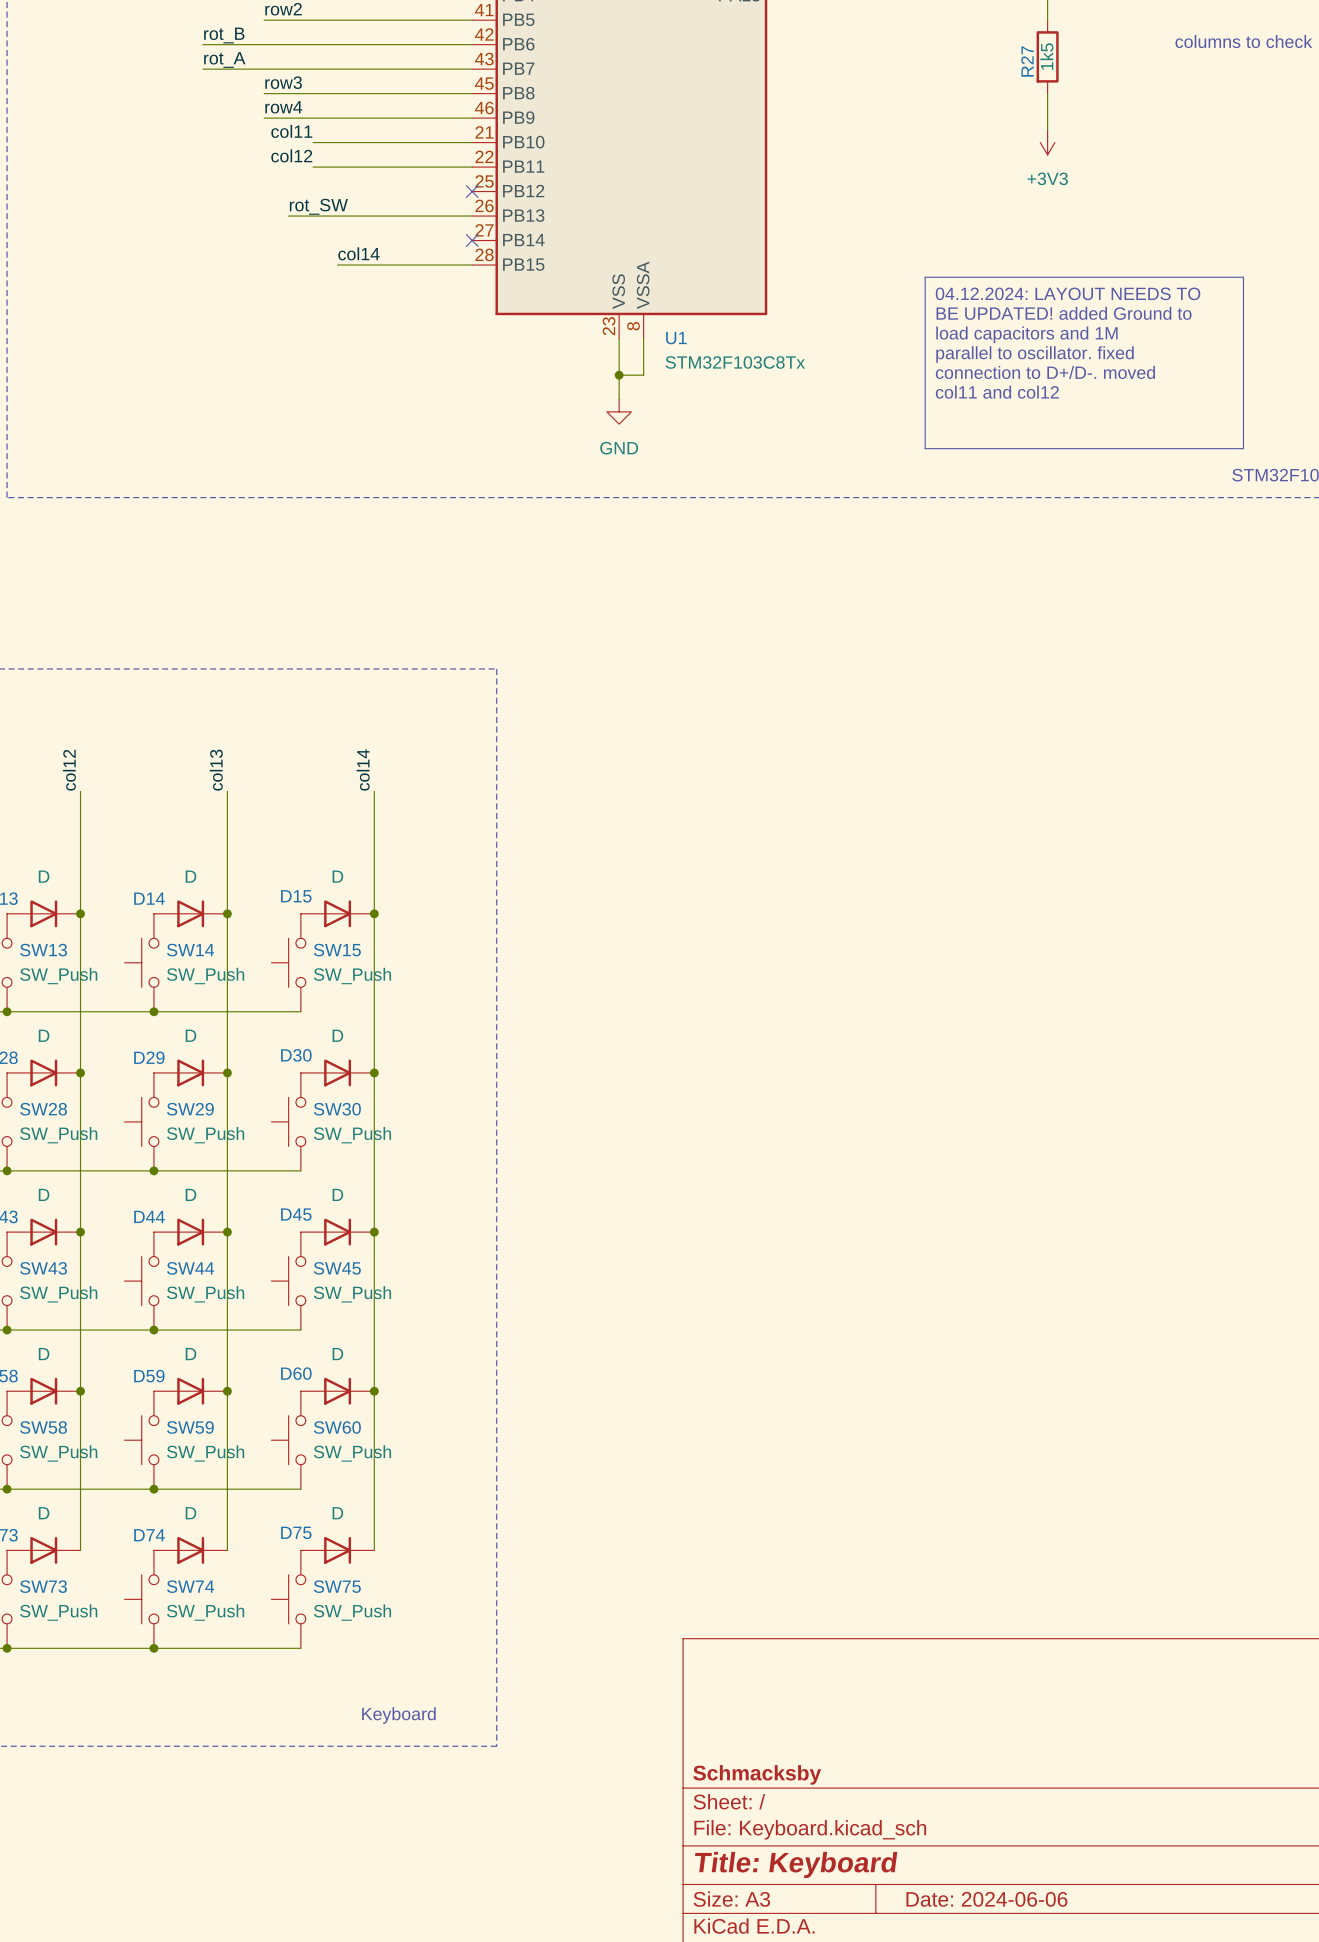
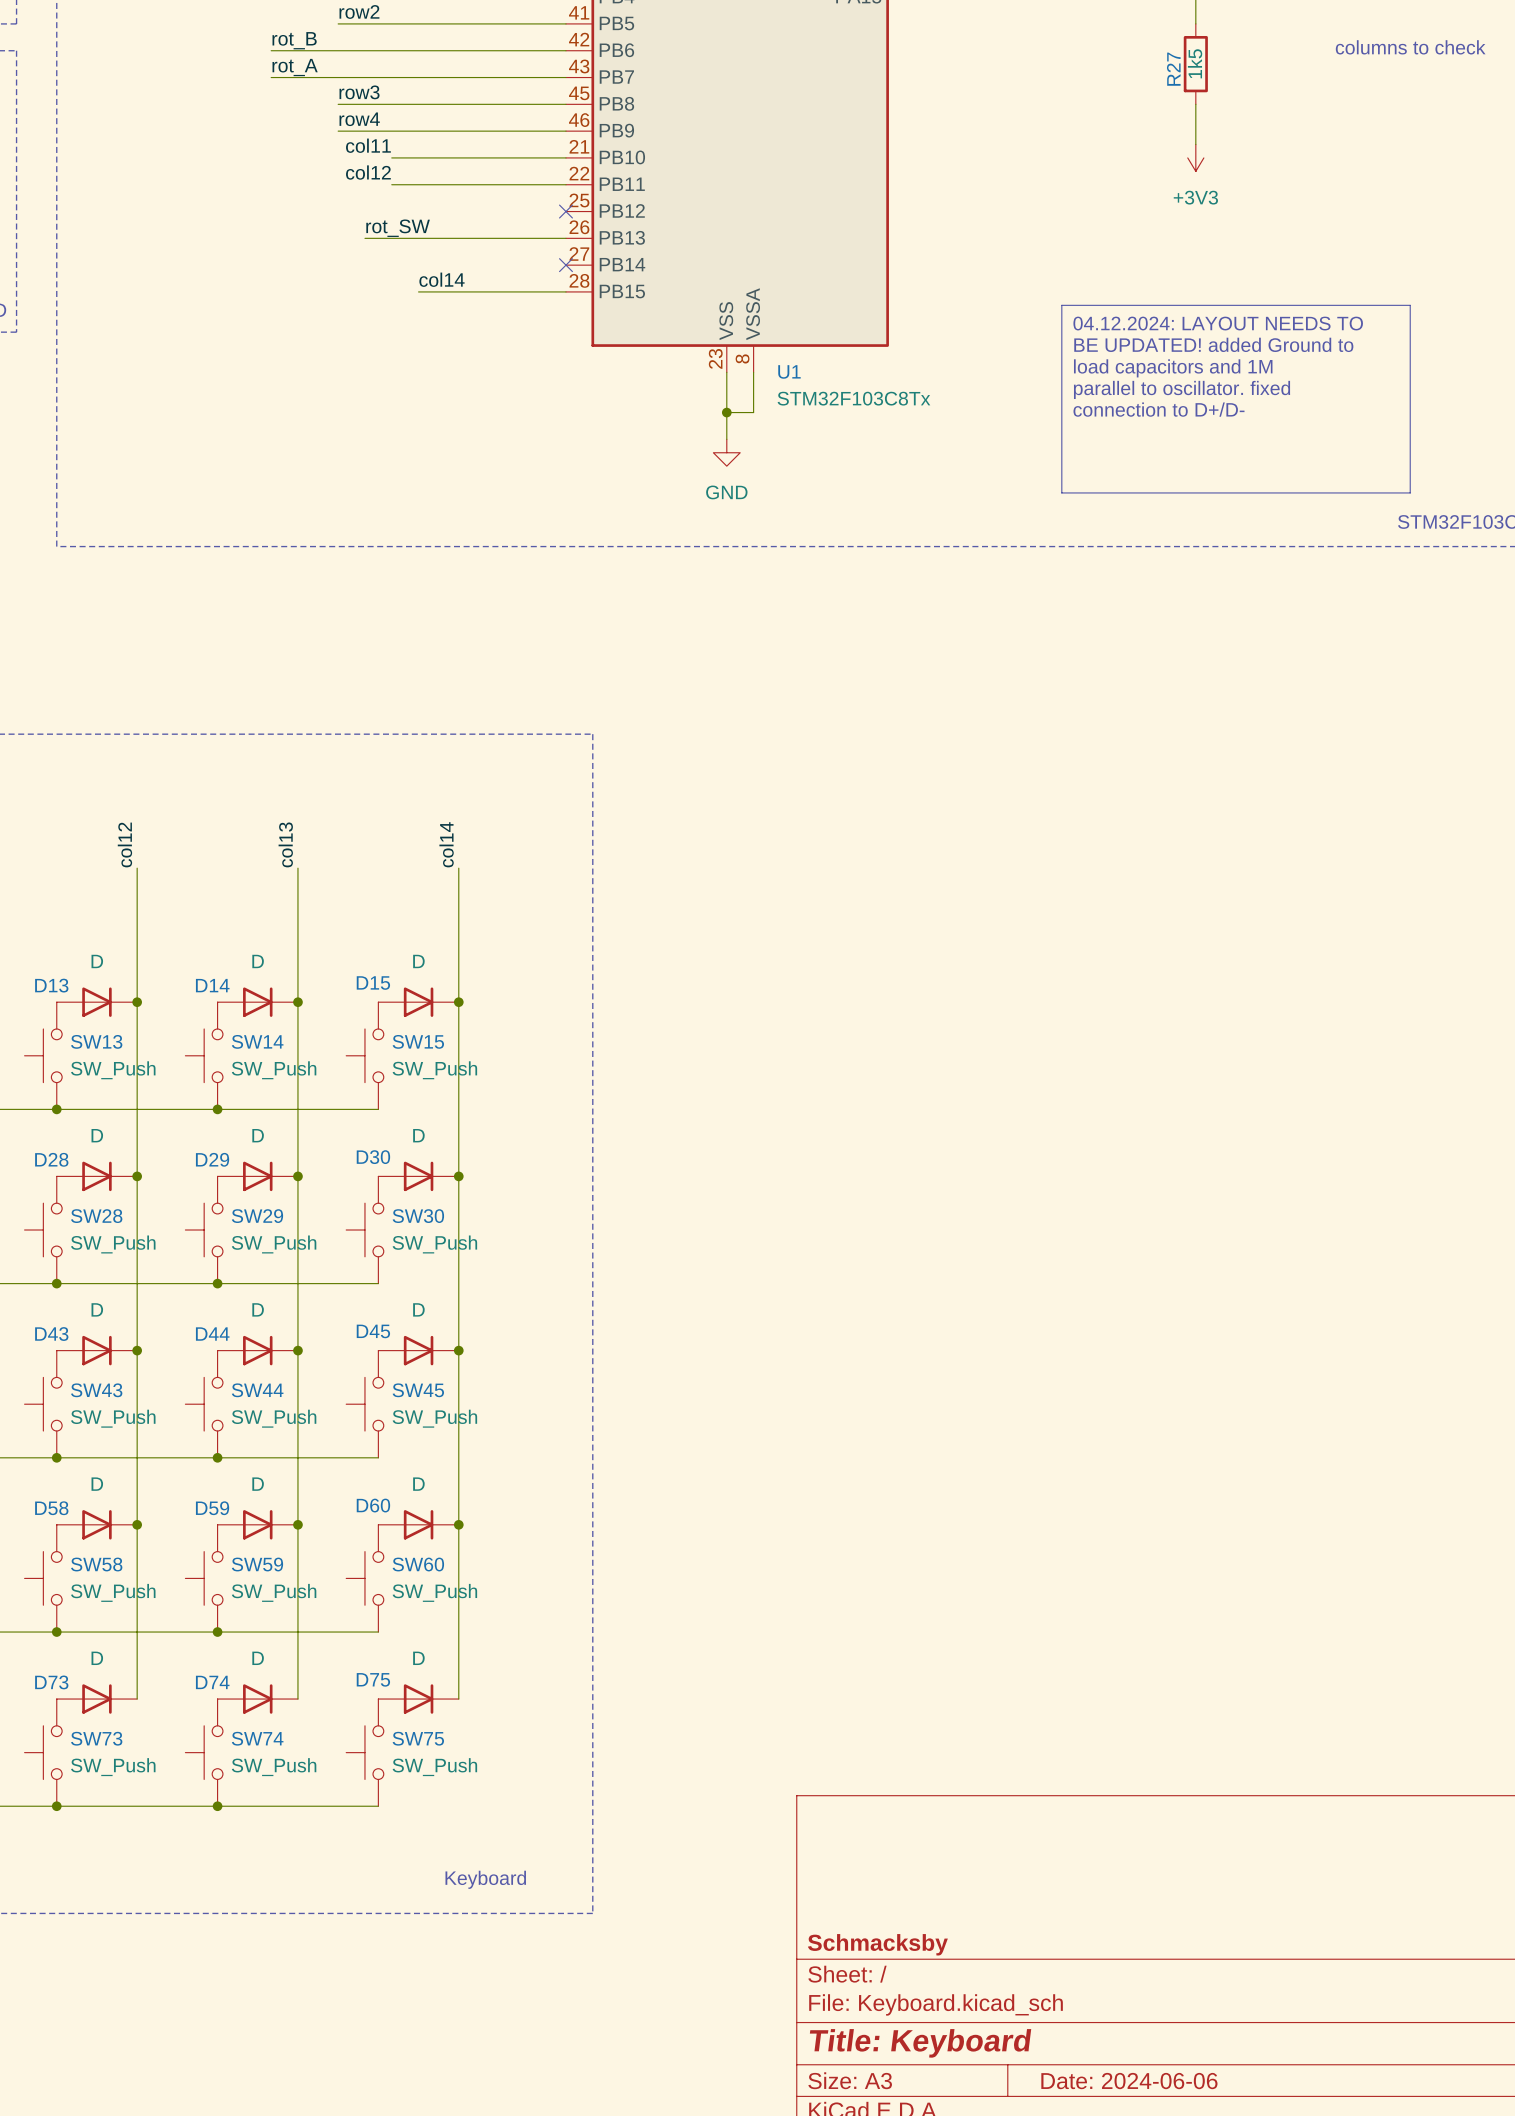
text: connection to D+/D-. moved (1045, 372) -> connection to D+/D- (1159, 409)
text: col11 and col12 (997, 392) -> none

